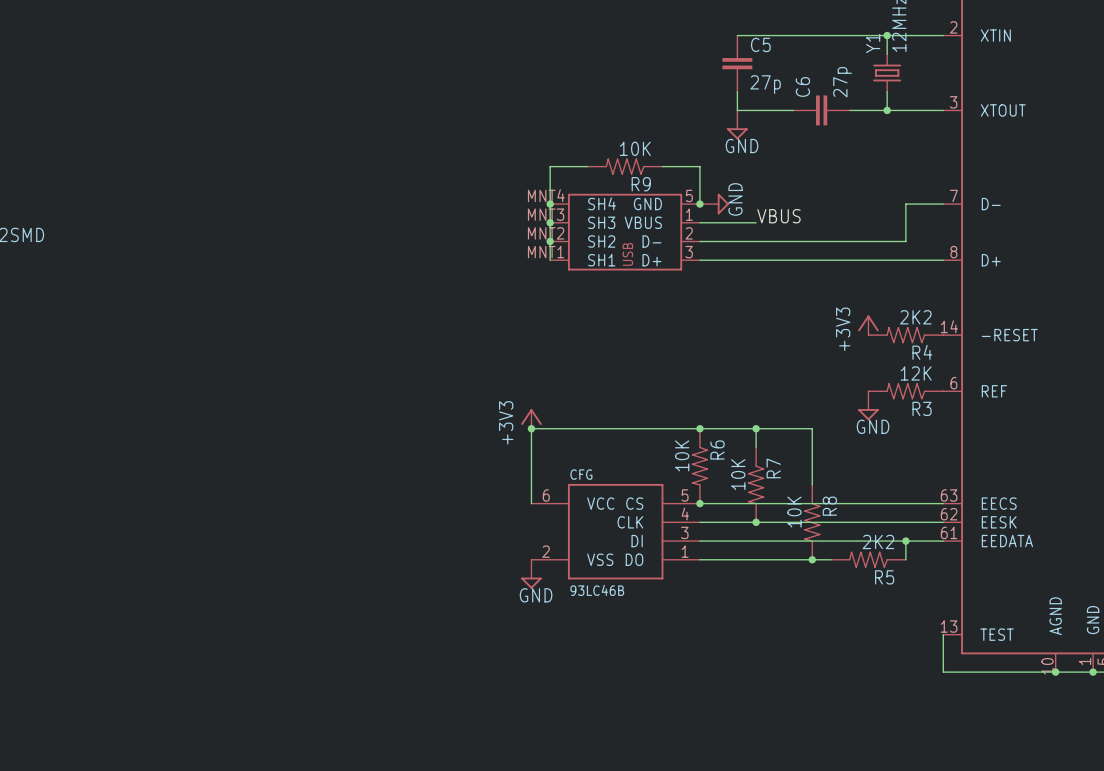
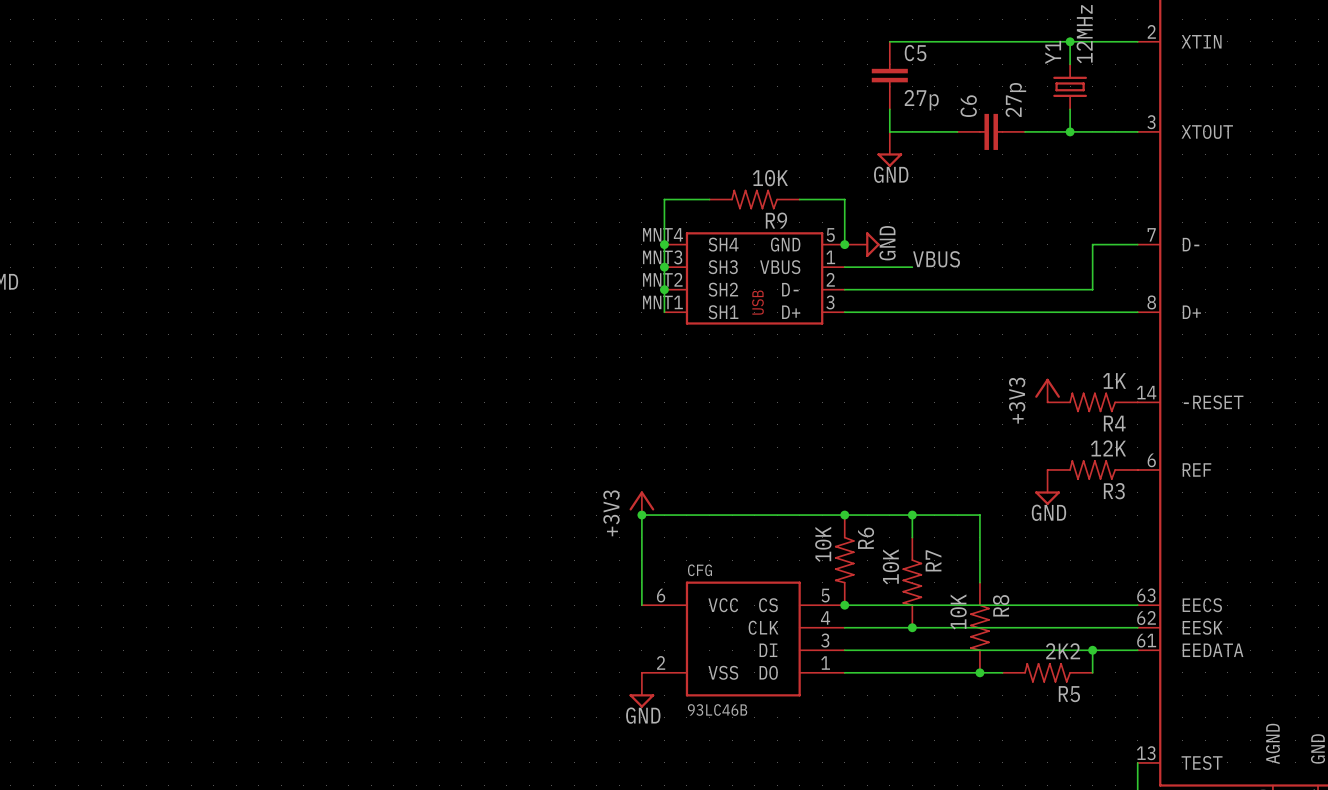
R4 value: 2K2 (915, 317) -> 1K (1114, 380)

